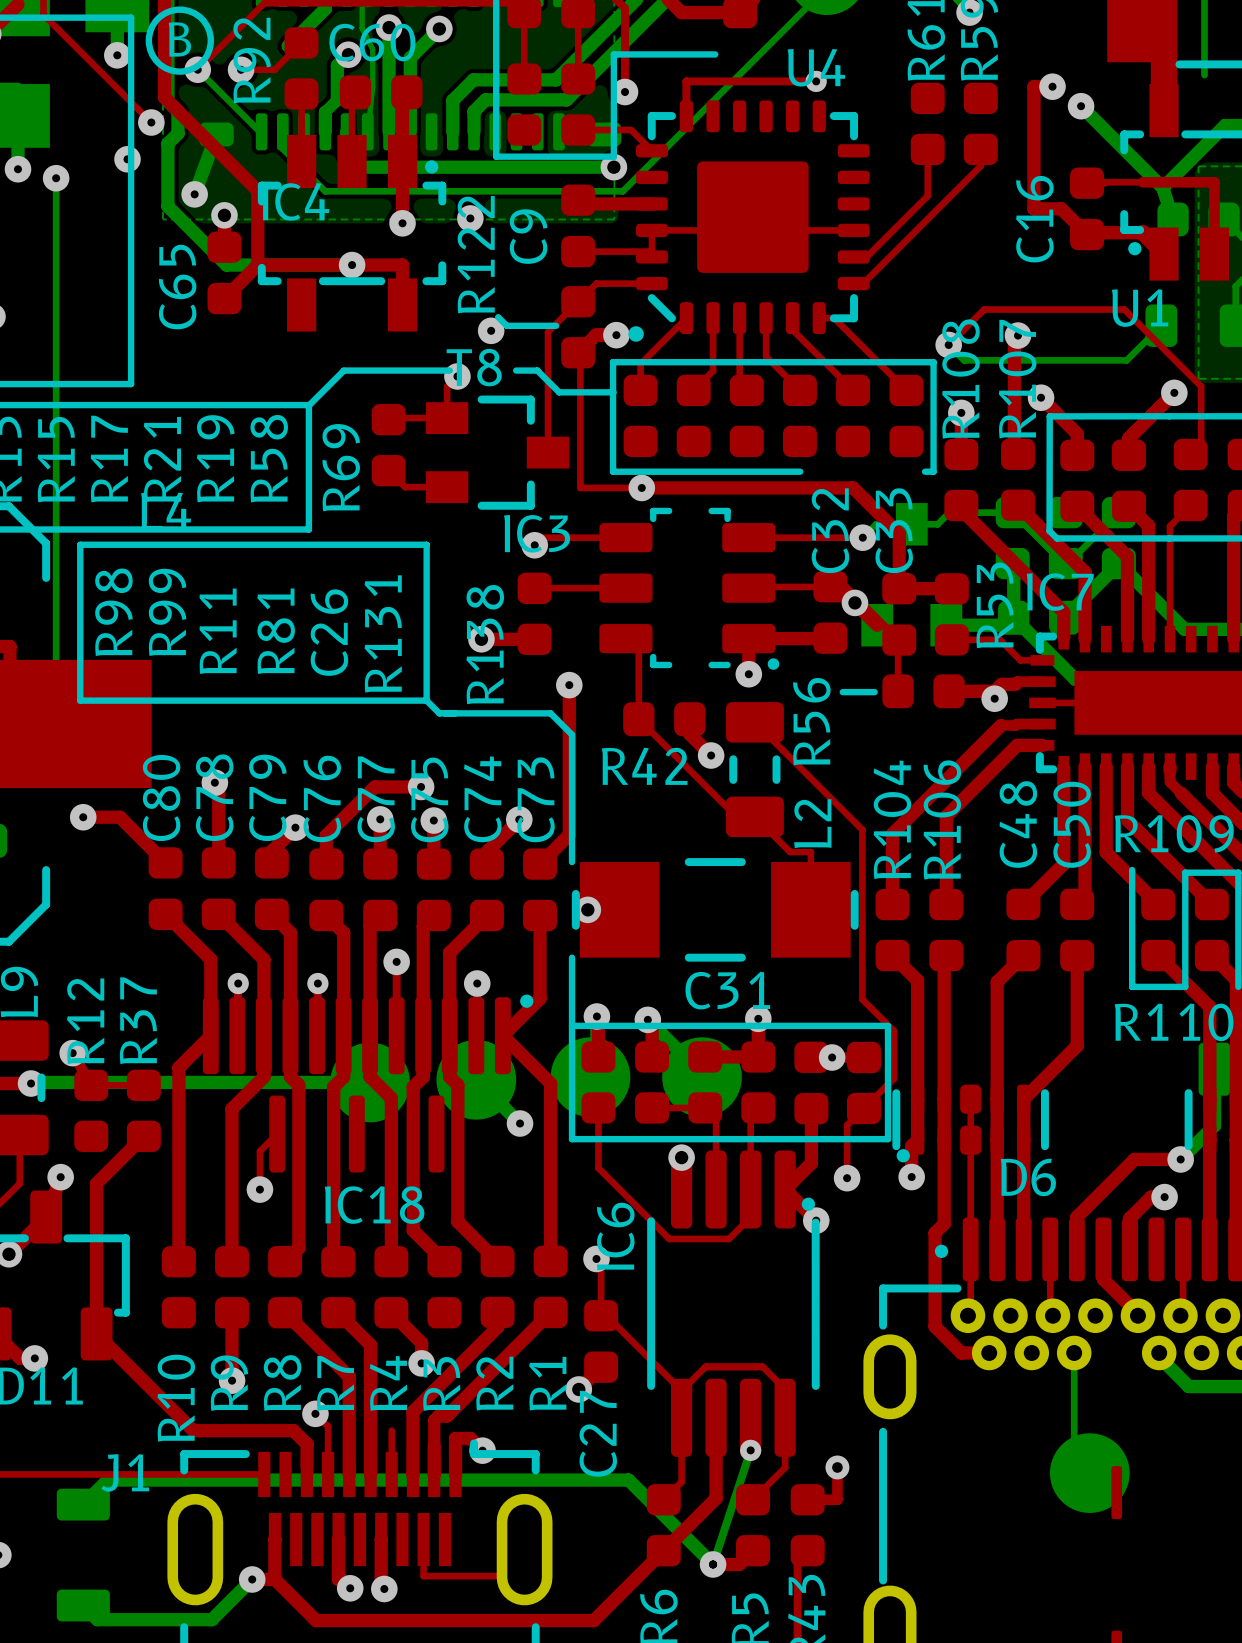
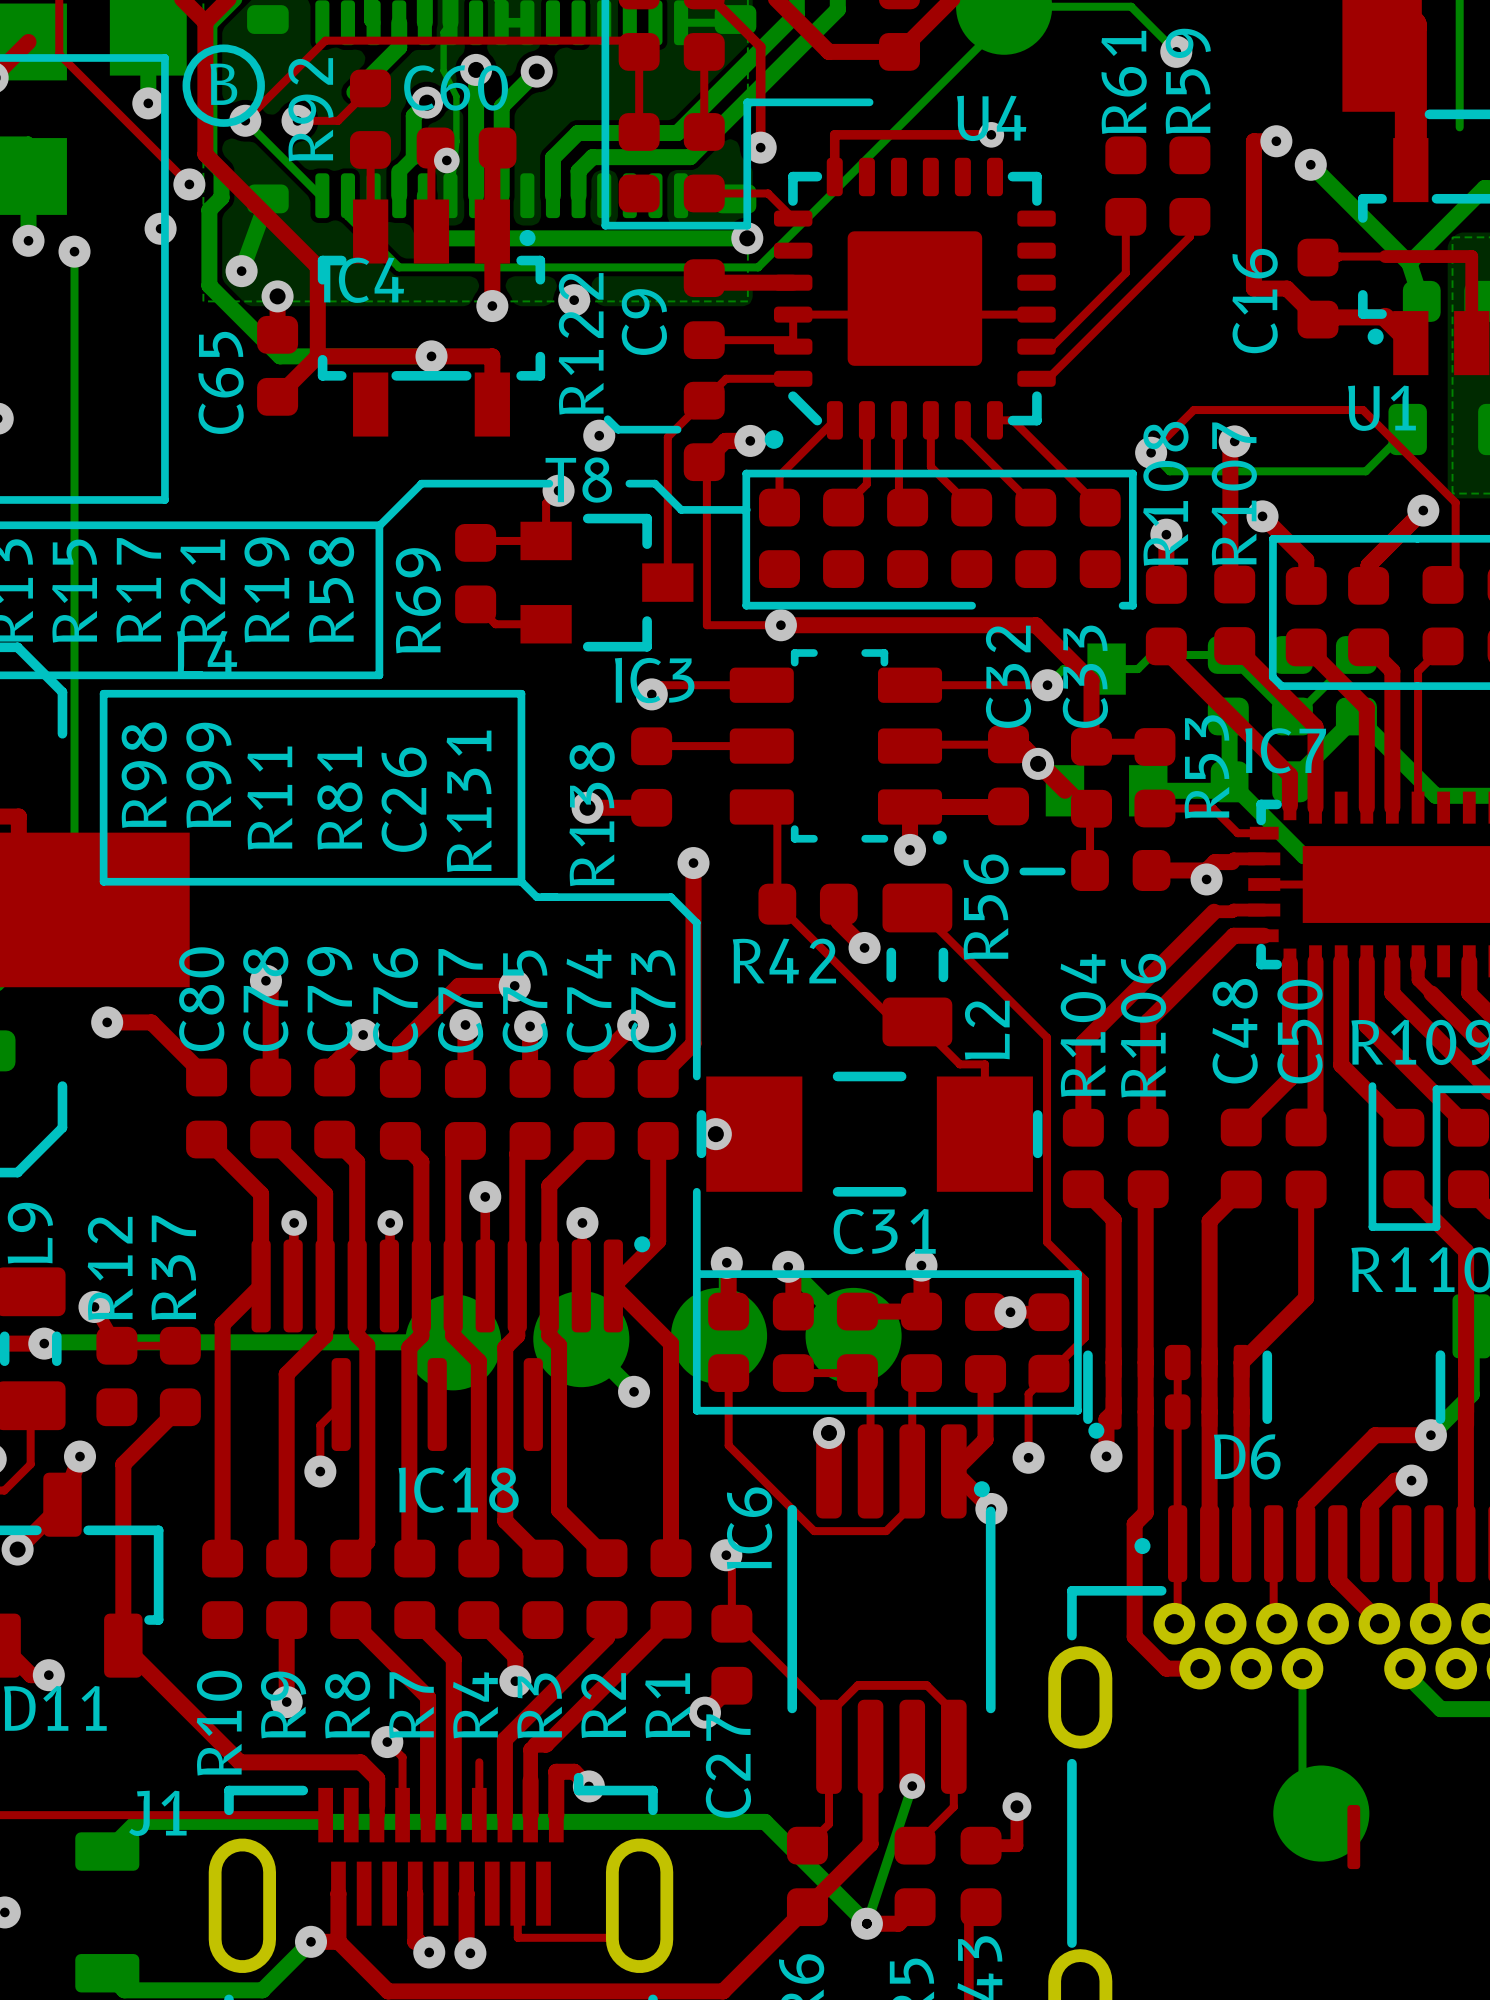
via: none -> (446, 160)

